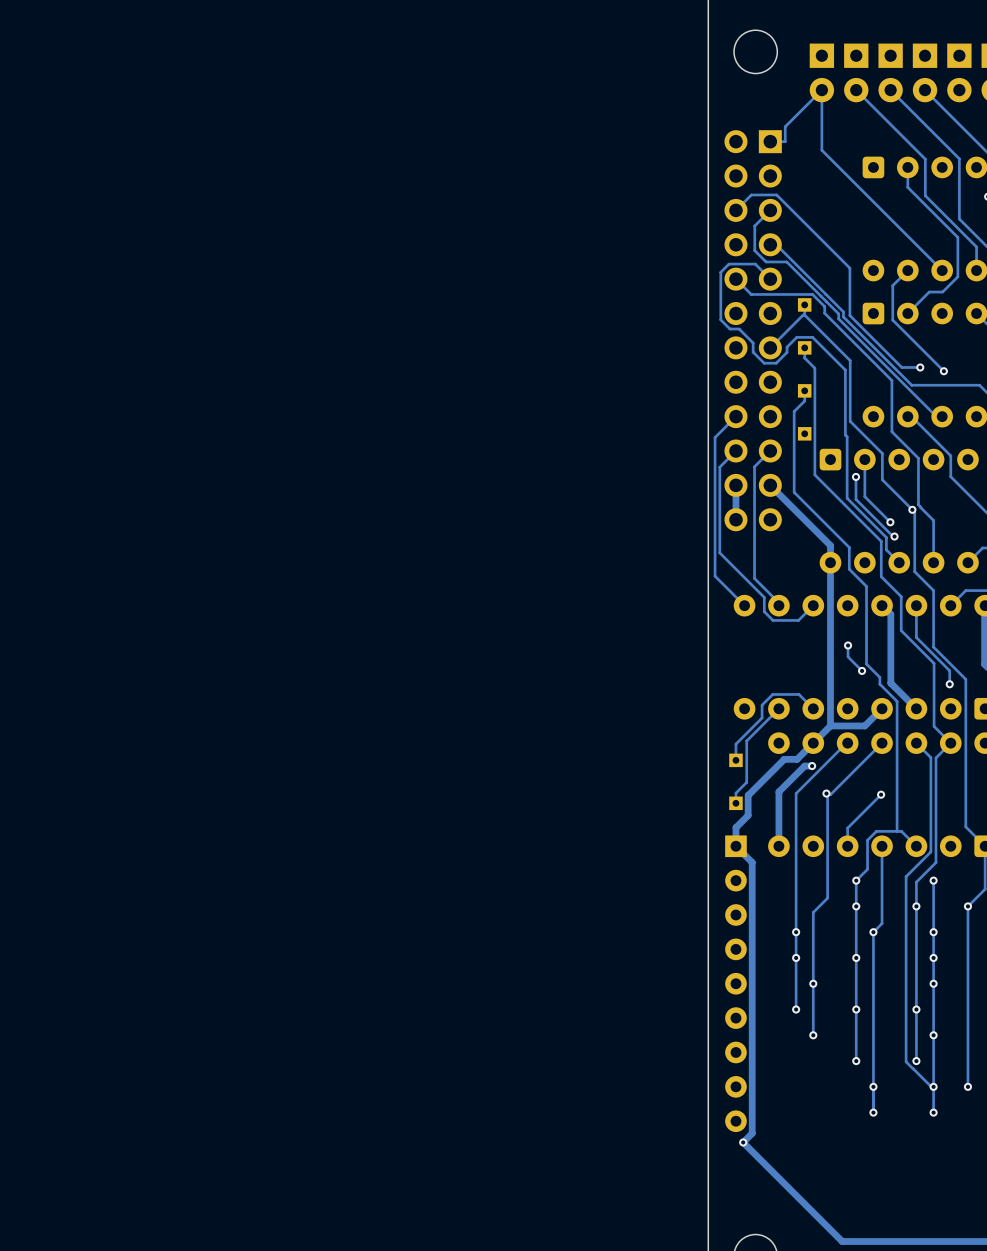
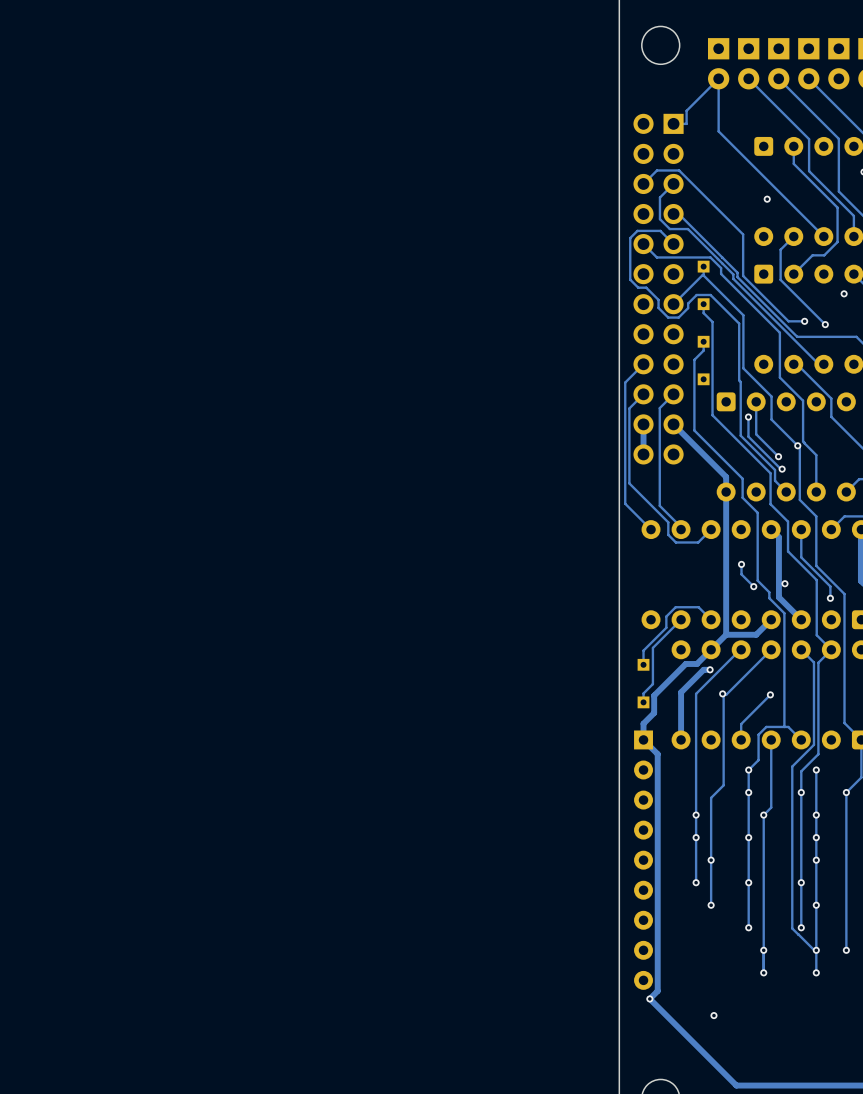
via: none -> (767, 199)
via: none -> (844, 293)
via: none -> (784, 583)
via: none -> (713, 1015)

